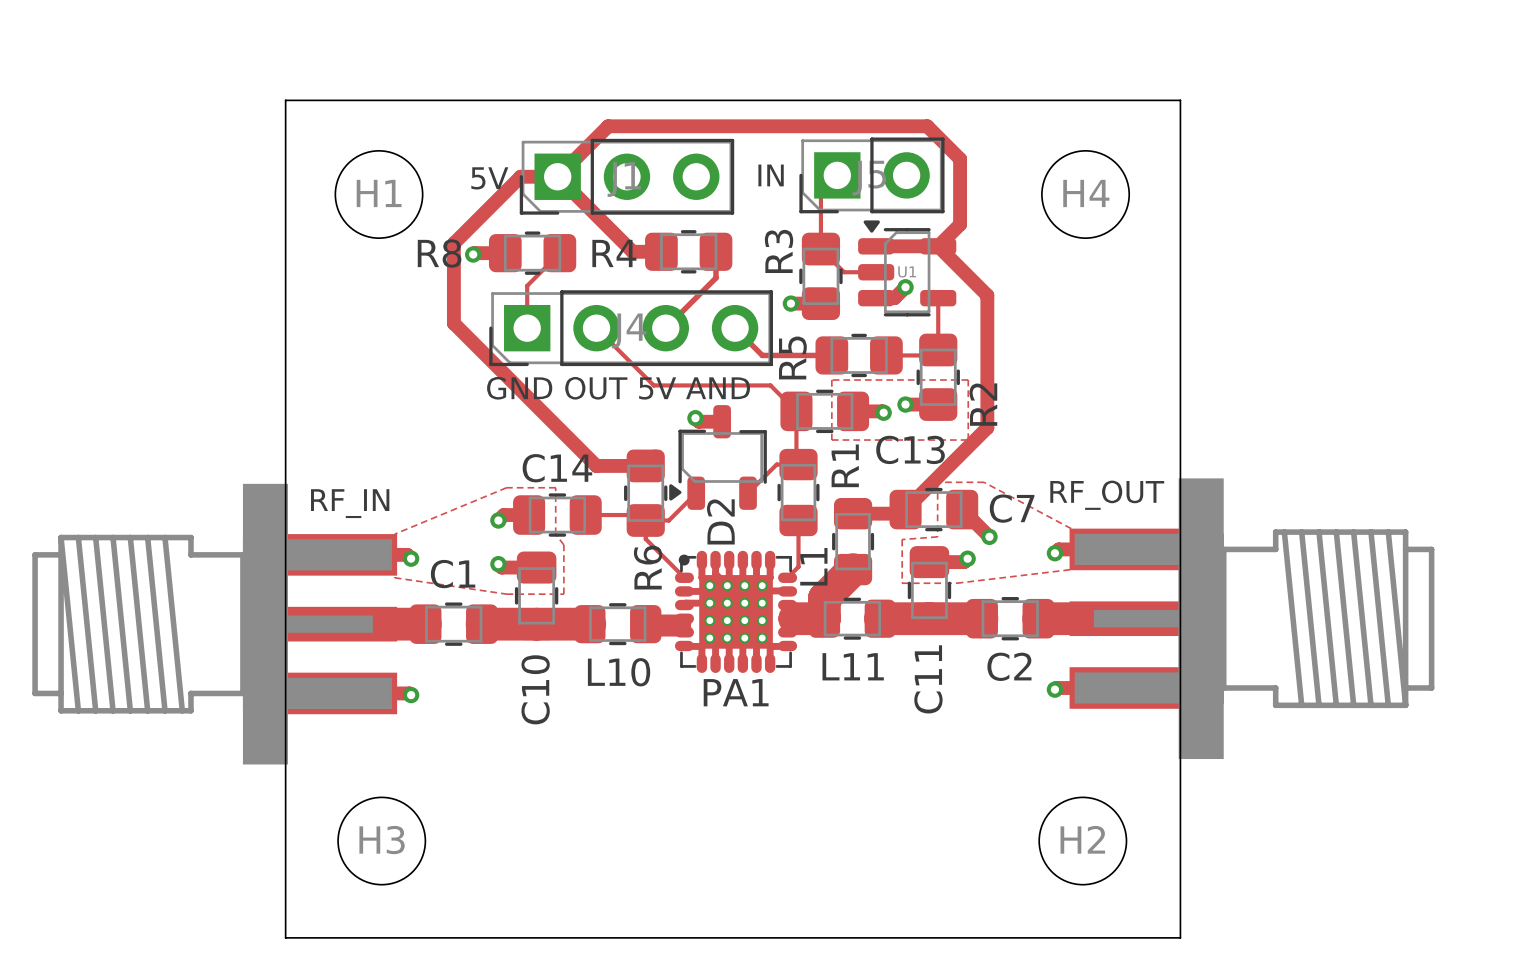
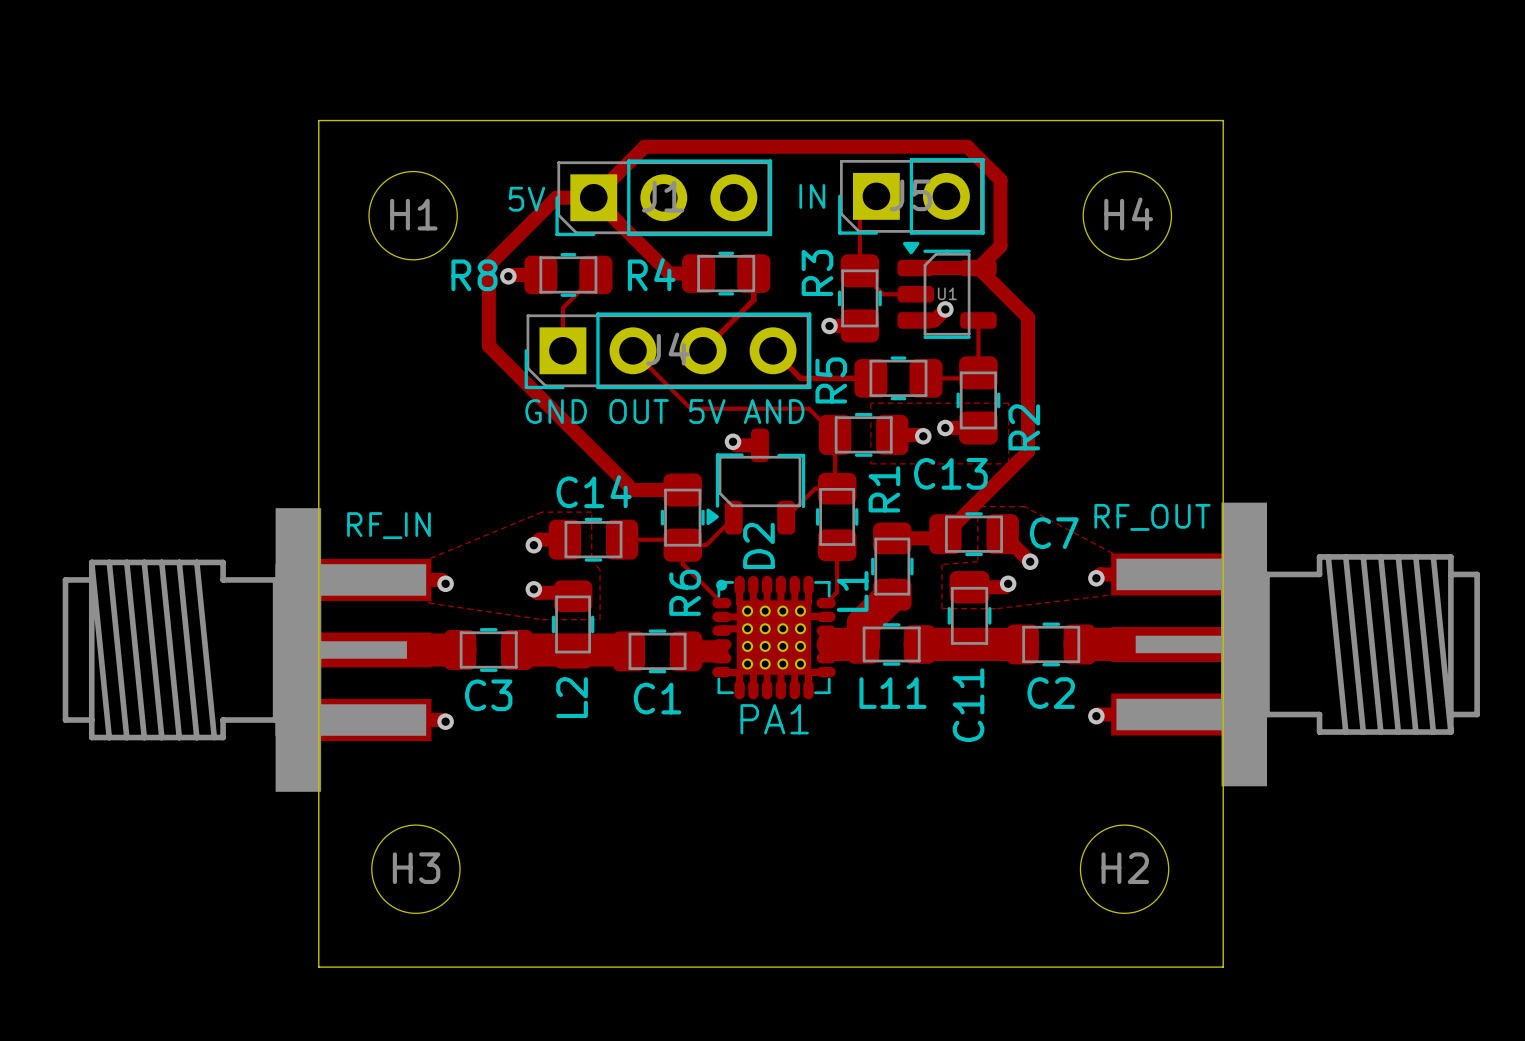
C1 name: C1 (453, 574) -> C3 (488, 695)
C10: (536, 595) -> none
L2: none -> (573, 624)
L10: (617, 624) -> none
C1: none -> (657, 651)

